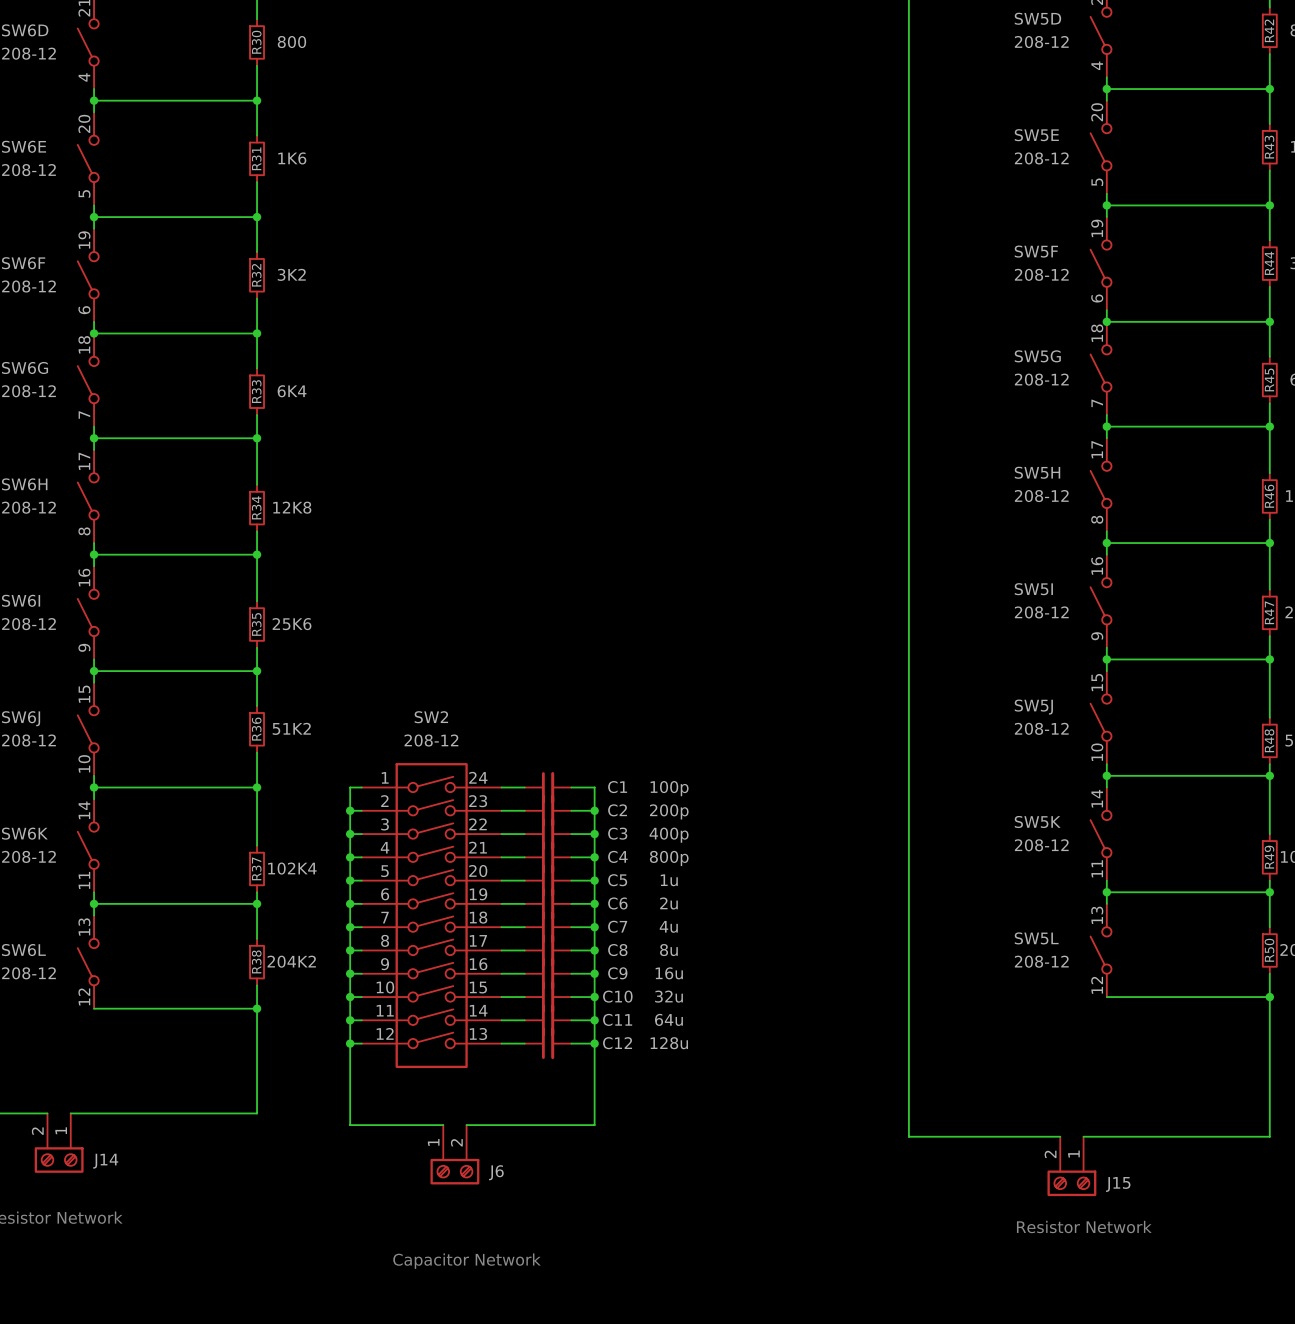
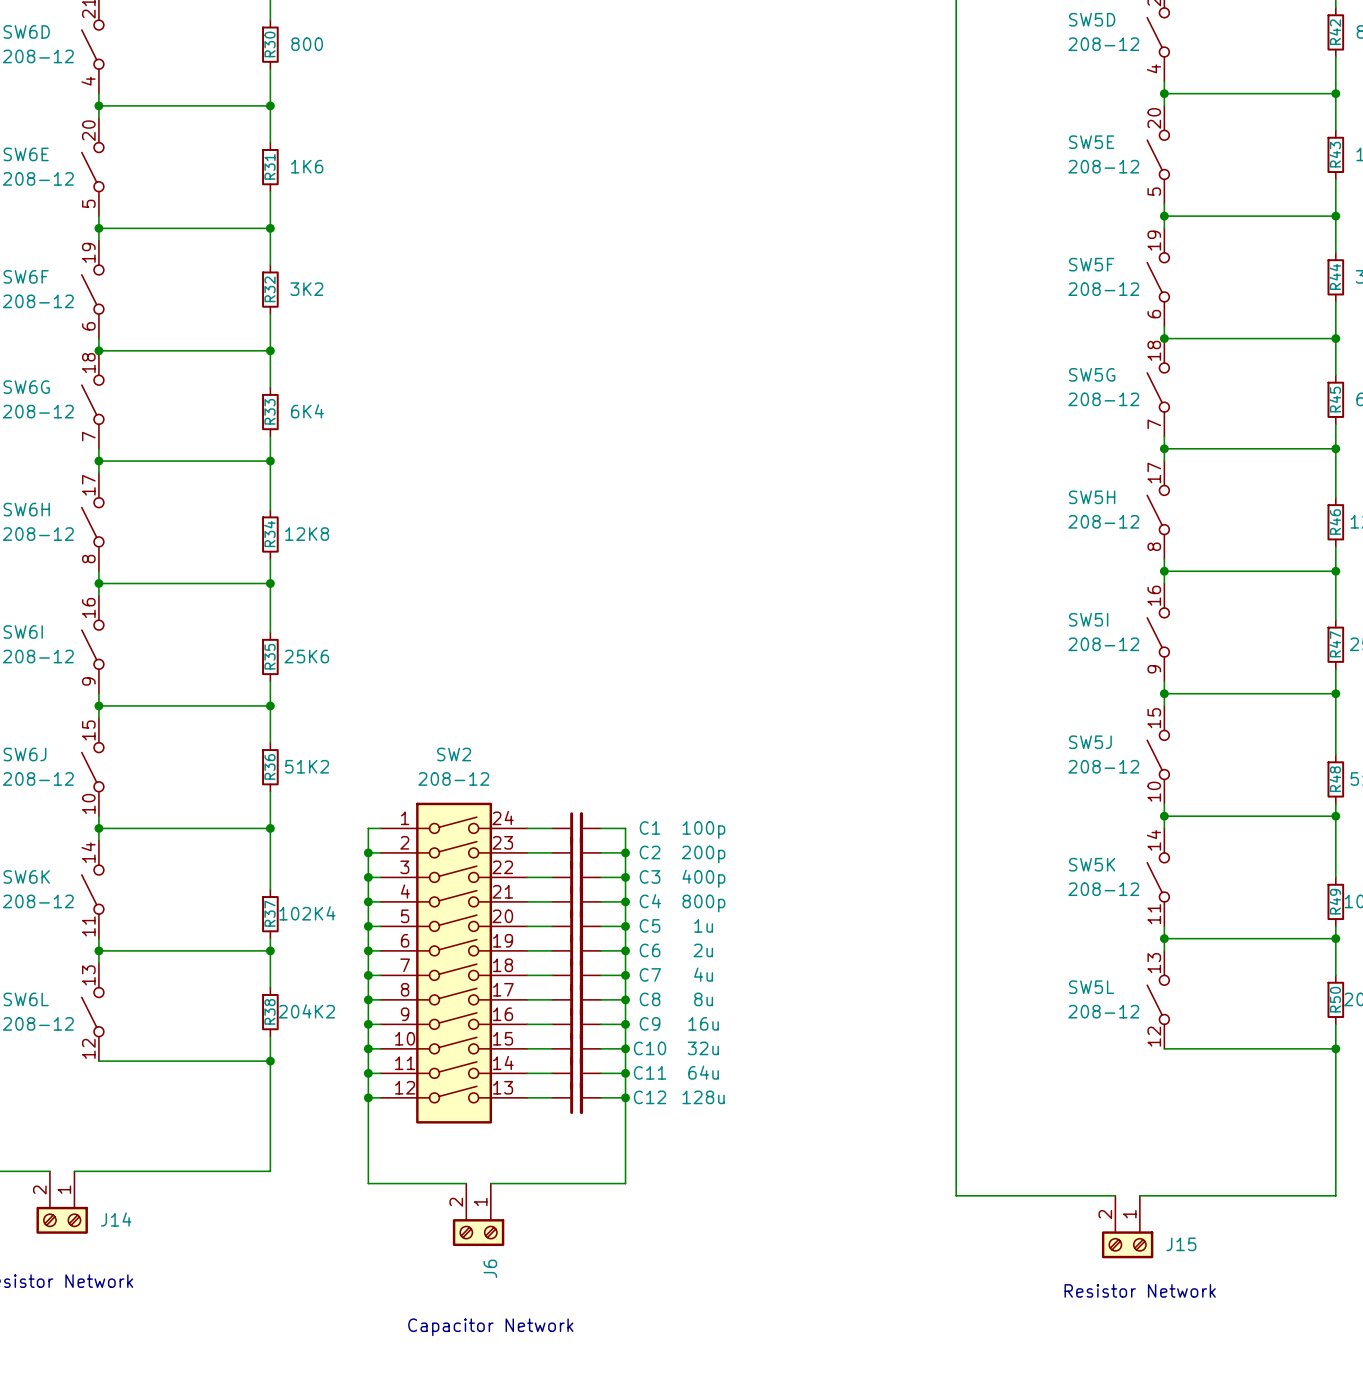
J6 pin number: 1 (433, 1142) -> 2 (456, 1202)
J6 pin number: 2 (456, 1142) -> 1 (480, 1201)
J6 name rotation: 0° (496, 1172) -> 90° counterclockwise (490, 1268)
J6 name position: J6 (496, 1172) -> J6 (490, 1268)

